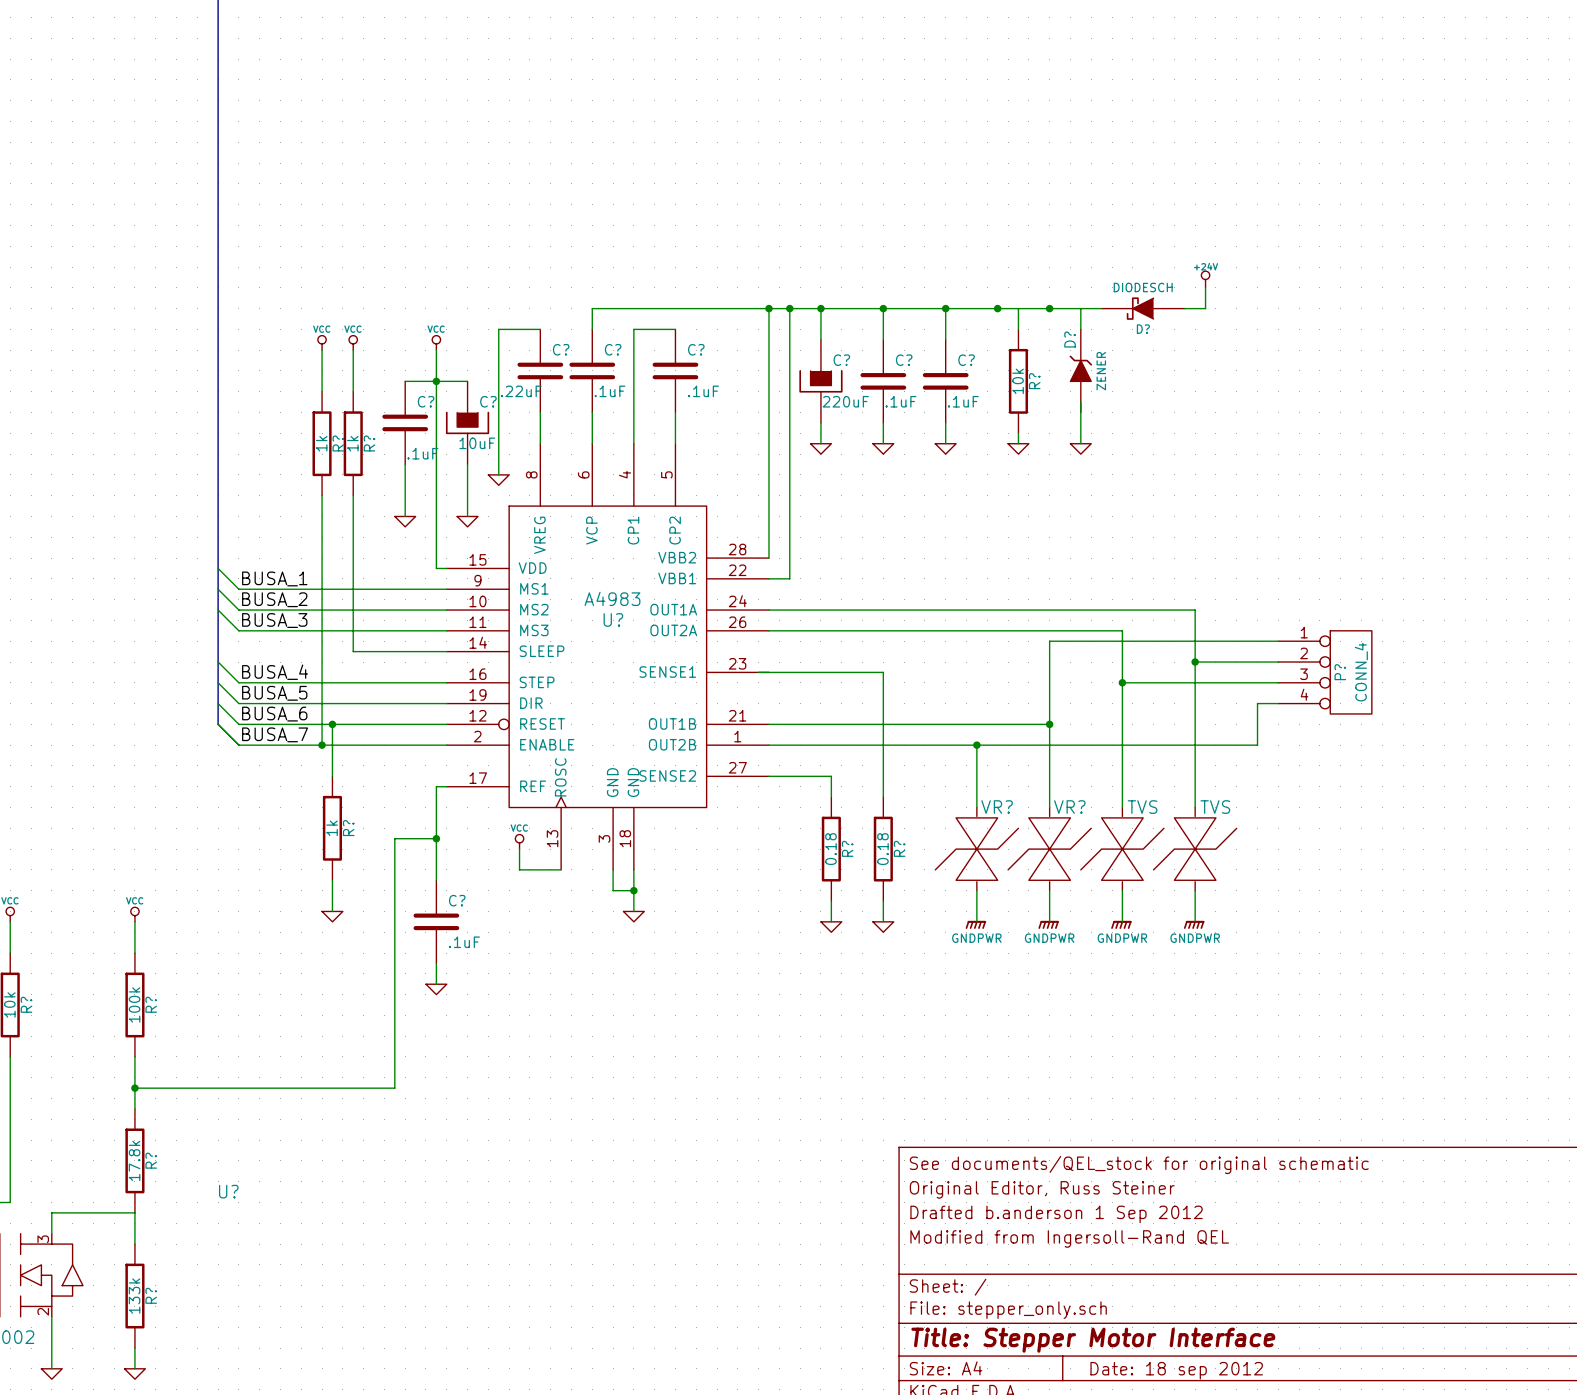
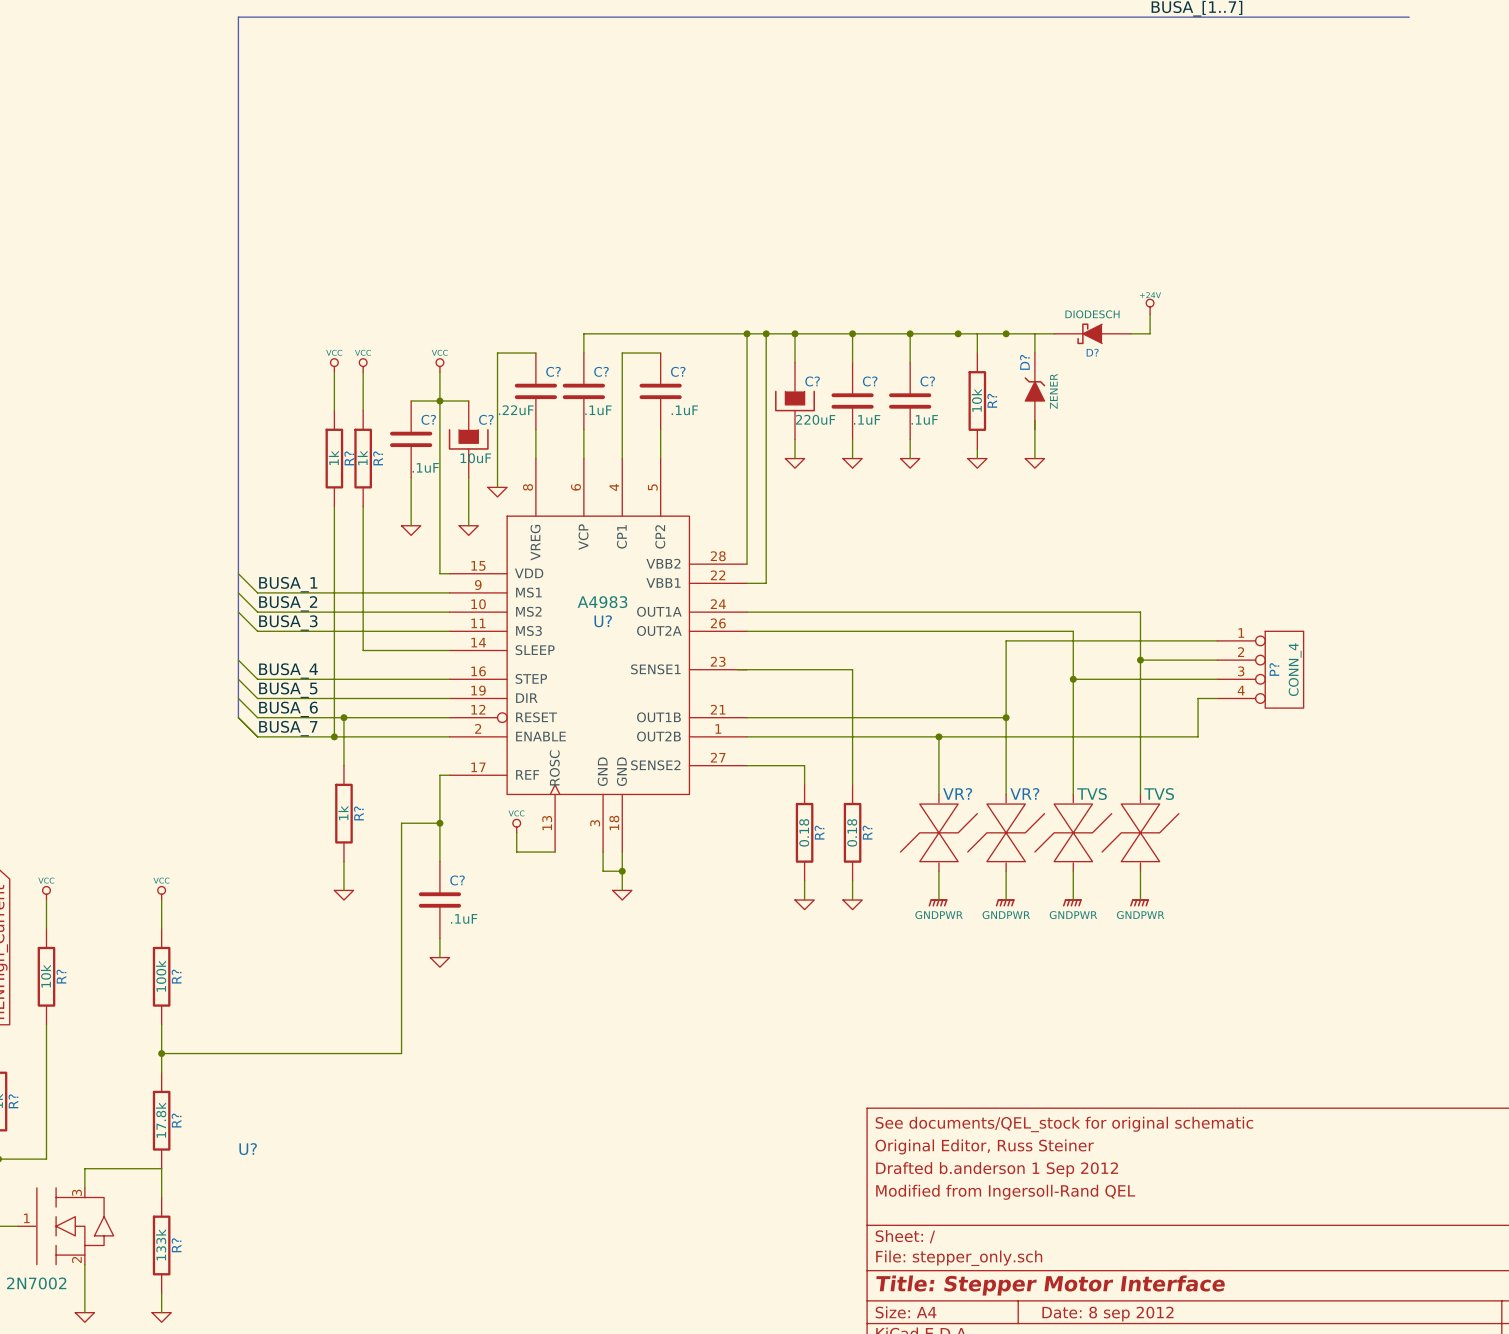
title block: Date: 18 sep 2012 (1176, 1370) -> Date: 8 sep 2012 (1107, 1314)

